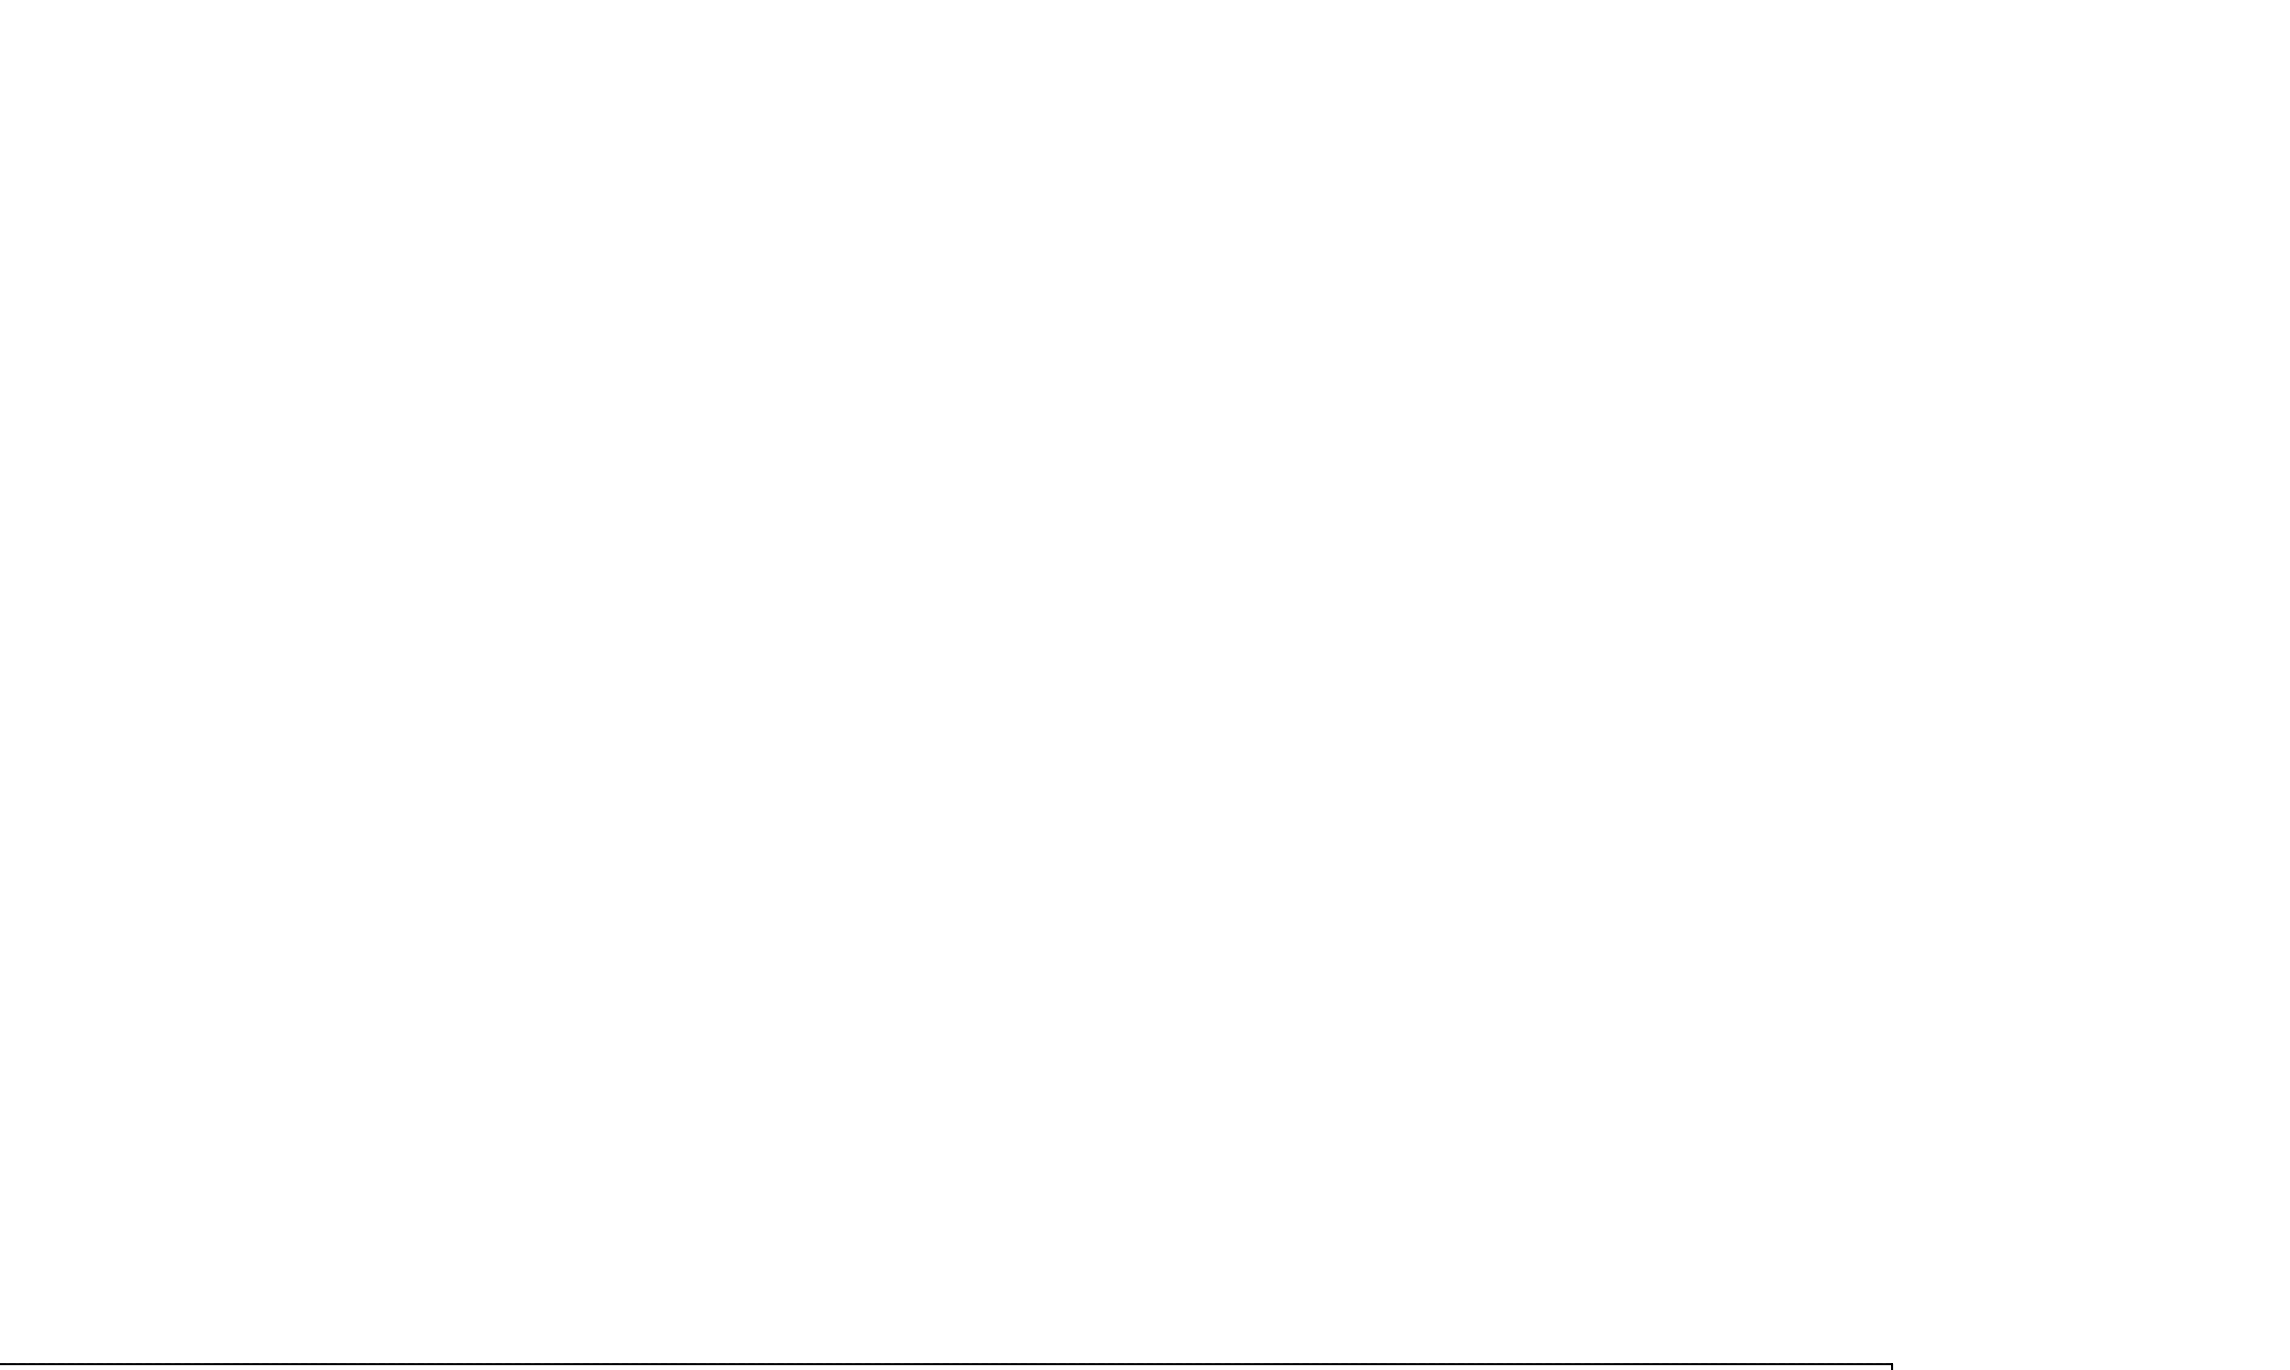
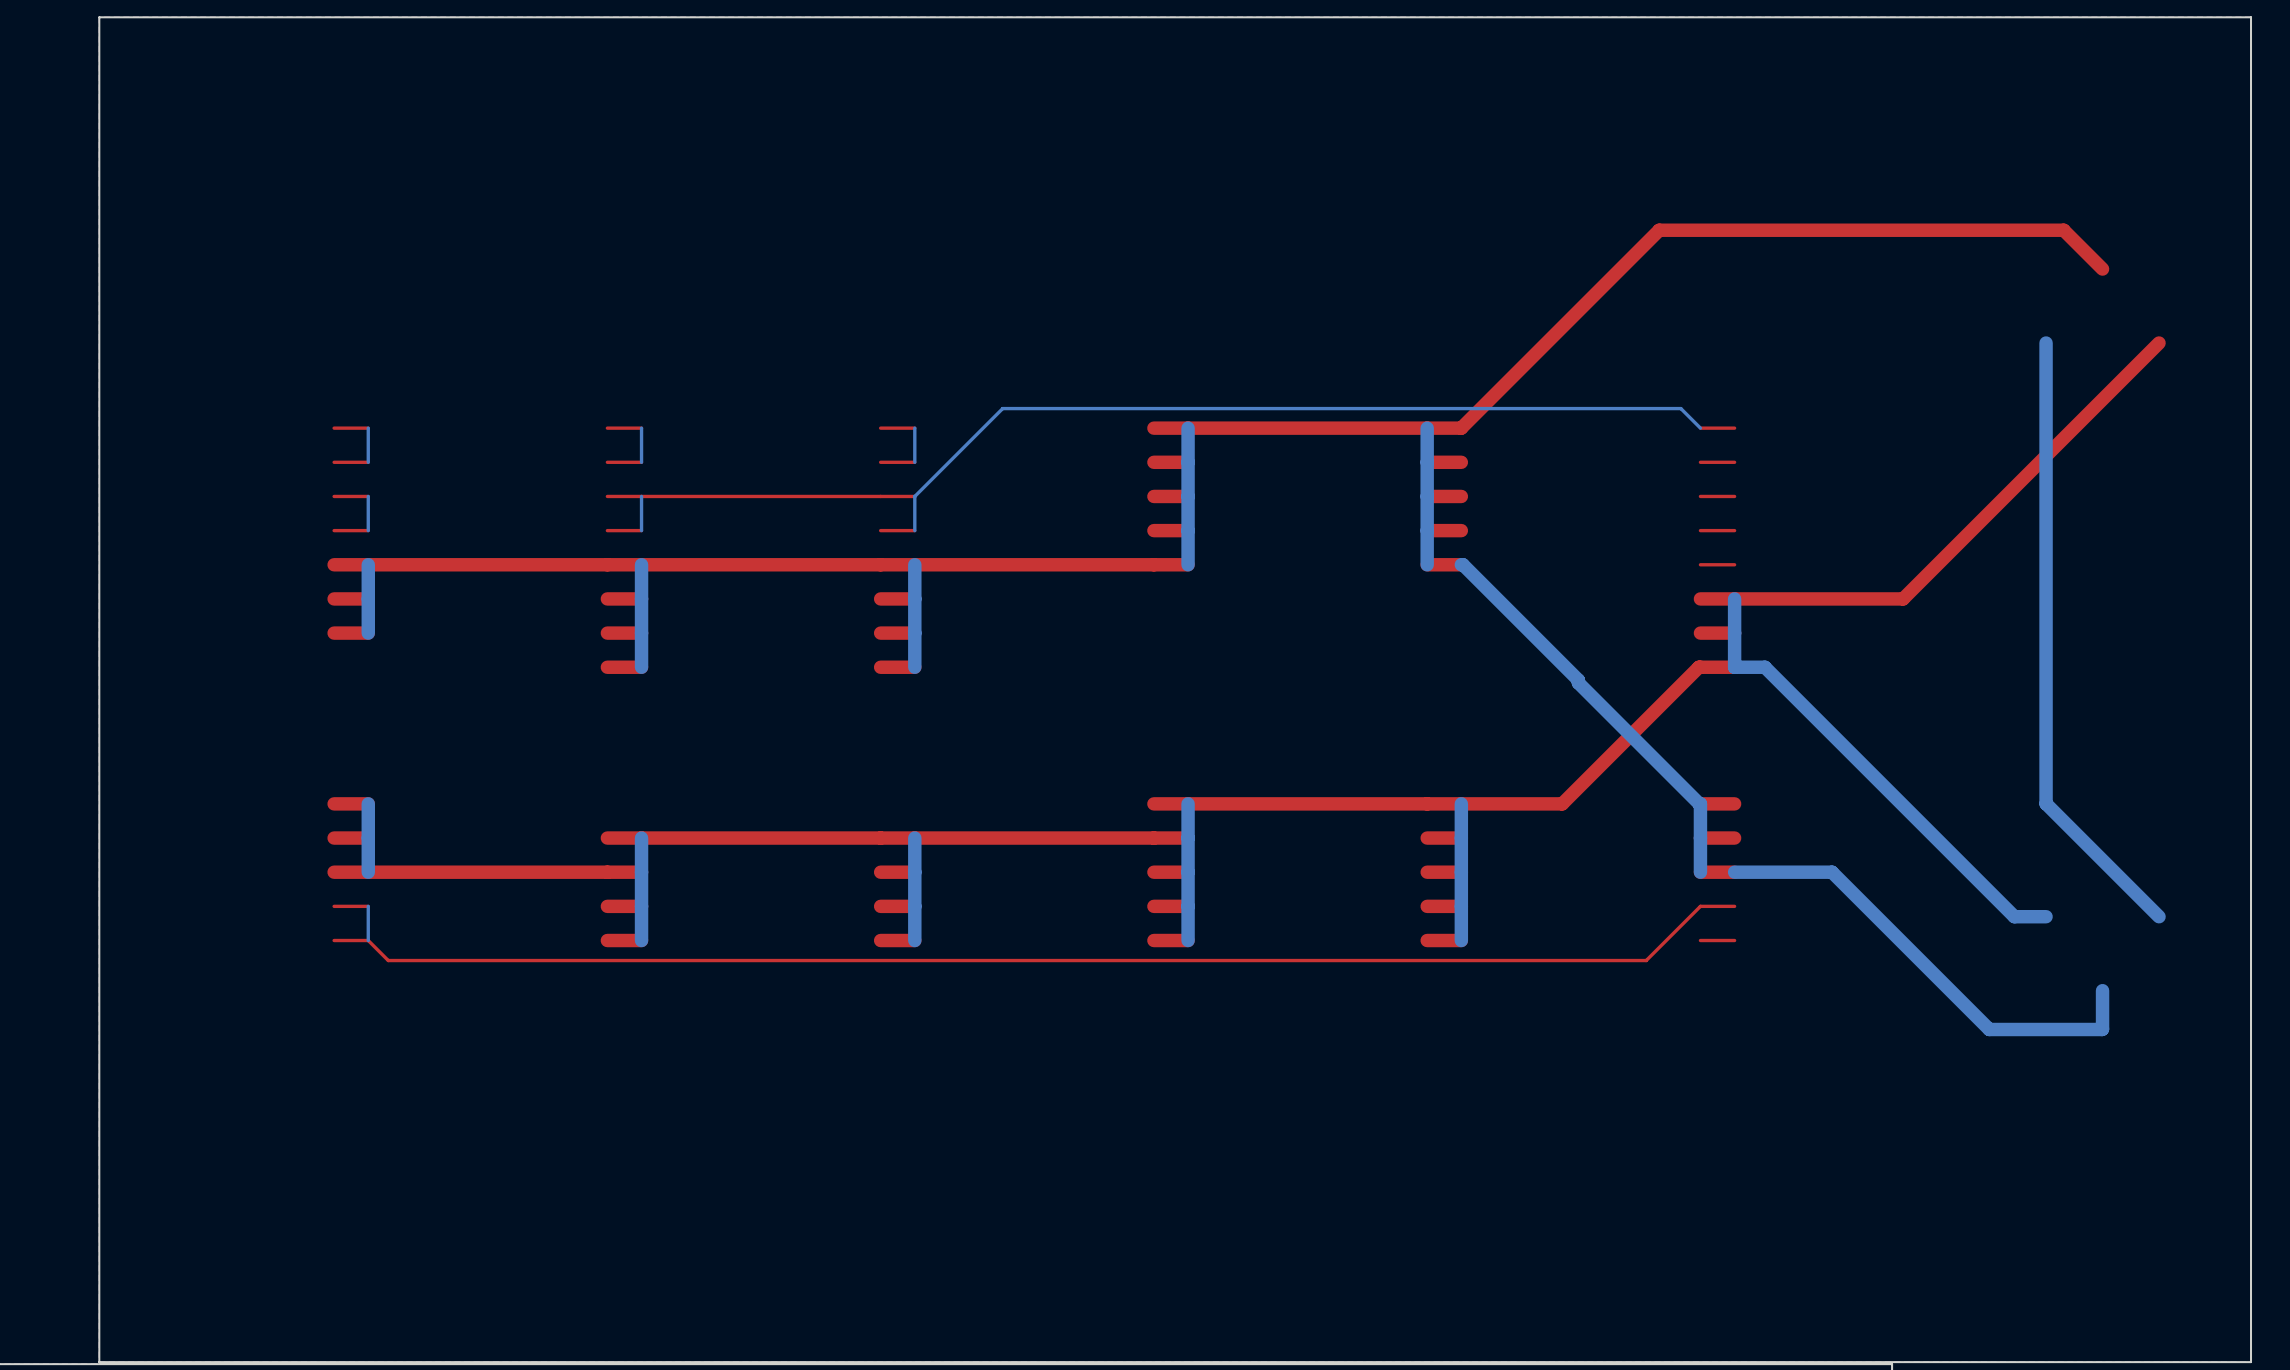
board edge: none -> (2251, 17) (99, 17) (99, 1362) (2251, 1362) (2251, 17)
top track: none -> (2102, 269) (2063, 230) (1659, 230) (1461, 428) (1153, 428)
bottom track: none -> (2046, 343) (2046, 803) (2159, 916)
top track: none -> (2159, 343) (1903, 598) (1700, 598)
top track: none -> (368, 428) (334, 428)
bottom track: none -> (368, 428) (368, 462)
top track: none -> (641, 428) (607, 428)
bottom track: none -> (641, 428) (641, 462)
top track: none -> (914, 428) (880, 428)
bottom track: none -> (914, 428) (914, 462)
bottom track: none -> (1188, 428) (1188, 564)
bottom track: none -> (1427, 428) (1427, 564)
bottom track: none -> (1700, 428) (1680, 408) (1002, 408) (914, 496) (914, 530)
top track: none -> (1734, 428) (1700, 428)
top track: none -> (368, 462) (334, 462)
top track: none -> (641, 462) (607, 462)
top track: none -> (914, 462) (880, 462)
top track: none -> (1188, 462) (1153, 462)
top track: none -> (1461, 462) (1427, 462)
top track: none -> (1734, 462) (1700, 462)
top track: none -> (368, 496) (334, 496)
bottom track: none -> (368, 496) (368, 530)
bottom track: none -> (641, 496) (641, 530)
top track: none -> (914, 496) (607, 496)
top track: none -> (1188, 496) (1153, 496)
top track: none -> (1461, 496) (1427, 496)
top track: none -> (1734, 496) (1700, 496)
top track: none -> (368, 530) (334, 530)
top track: none -> (641, 530) (607, 530)
top track: none -> (914, 530) (880, 530)
top track: none -> (1188, 530) (1153, 530)
top track: none -> (1461, 530) (1427, 530)
top track: none -> (1734, 530) (1700, 530)
bottom track: none -> (368, 564) (368, 633)
bottom track: none -> (641, 564) (641, 667)
bottom track: none -> (914, 564) (914, 667)
top track: none -> (1188, 564) (334, 564)
top track: none -> (1461, 564) (1427, 564)
bottom track: none -> (1461, 564) (1700, 803) (1700, 872)
top track: none -> (1734, 564) (1700, 564)
top track: none -> (368, 598) (334, 598)
top track: none -> (641, 598) (607, 598)
top track: none -> (914, 598) (880, 598)
bottom track: none -> (1734, 598) (1734, 667) (1764, 667) (2014, 916) (2046, 916)
top track: none -> (368, 633) (334, 633)
top track: none -> (641, 633) (607, 633)
top track: none -> (914, 633) (880, 633)
top track: none -> (1734, 633) (1700, 633)
top track: none -> (641, 667) (607, 667)
top track: none -> (914, 667) (880, 667)
top track: none -> (1734, 667) (1698, 667) (1562, 803) (1153, 803)
top track: none -> (368, 803) (334, 803)
bottom track: none -> (368, 803) (368, 872)
bottom track: none -> (1188, 803) (1188, 940)
bottom track: none -> (1461, 803) (1461, 940)
top track: none -> (1734, 803) (1700, 803)
top track: none -> (368, 838) (334, 838)
bottom track: none -> (641, 838) (641, 940)
bottom track: none -> (914, 838) (914, 940)
top track: none -> (1188, 838) (607, 838)
top track: none -> (1461, 838) (1427, 838)
top track: none -> (1734, 838) (1700, 838)
top track: none -> (641, 872) (334, 872)
top track: none -> (914, 872) (880, 872)
top track: none -> (1188, 872) (1153, 872)
top track: none -> (1461, 872) (1427, 872)
top track: none -> (1734, 872) (1700, 872)
bottom track: none -> (1734, 872) (1832, 872) (1989, 1029) (2102, 1029) (2102, 990)
top track: none -> (368, 906) (334, 906)
bottom track: none -> (368, 906) (368, 940)
top track: none -> (641, 906) (607, 906)
top track: none -> (914, 906) (880, 906)
top track: none -> (1188, 906) (1153, 906)
top track: none -> (1461, 906) (1427, 906)
top track: none -> (1734, 906) (1700, 906) (1646, 960) (388, 960) (368, 940) (334, 940)
top track: none -> (641, 940) (607, 940)
top track: none -> (914, 940) (880, 940)
top track: none -> (1188, 940) (1153, 940)
top track: none -> (1461, 940) (1427, 940)
top track: none -> (1734, 940) (1700, 940)

